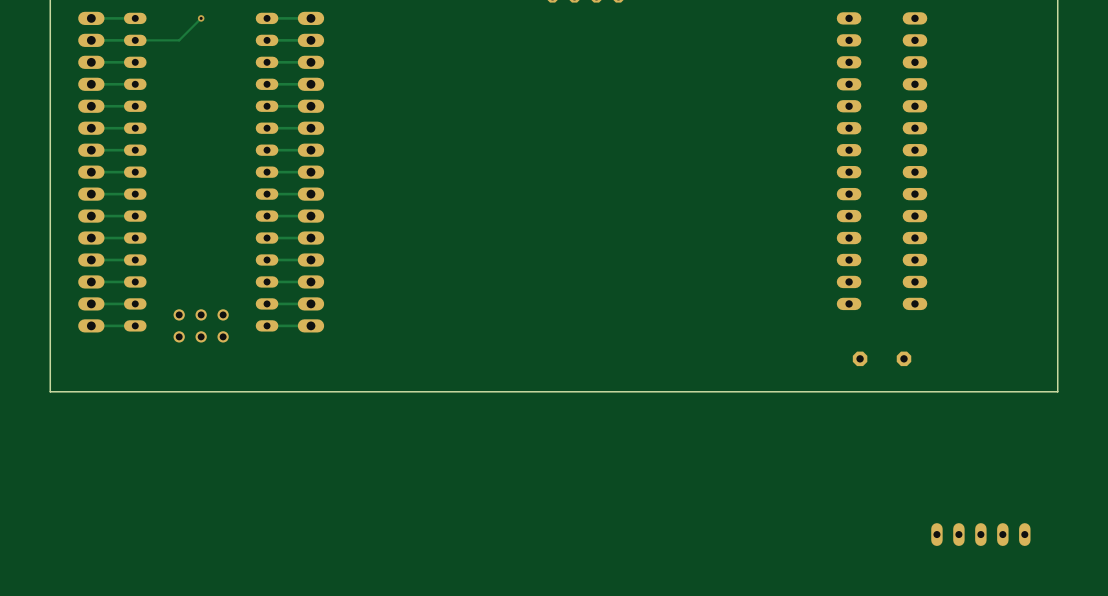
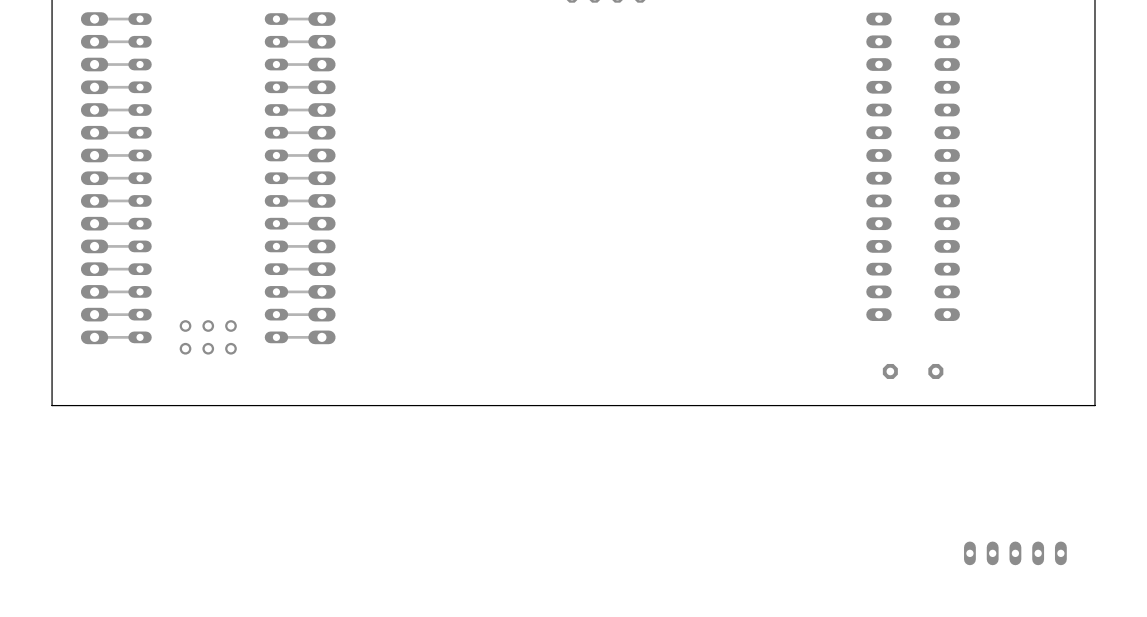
track: (201, 18) (179, 40) (135, 40) -> none
via: (201, 18) -> none

